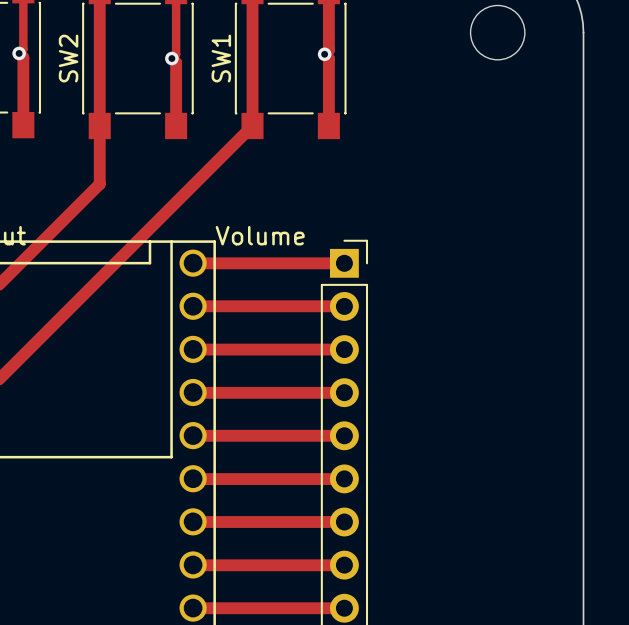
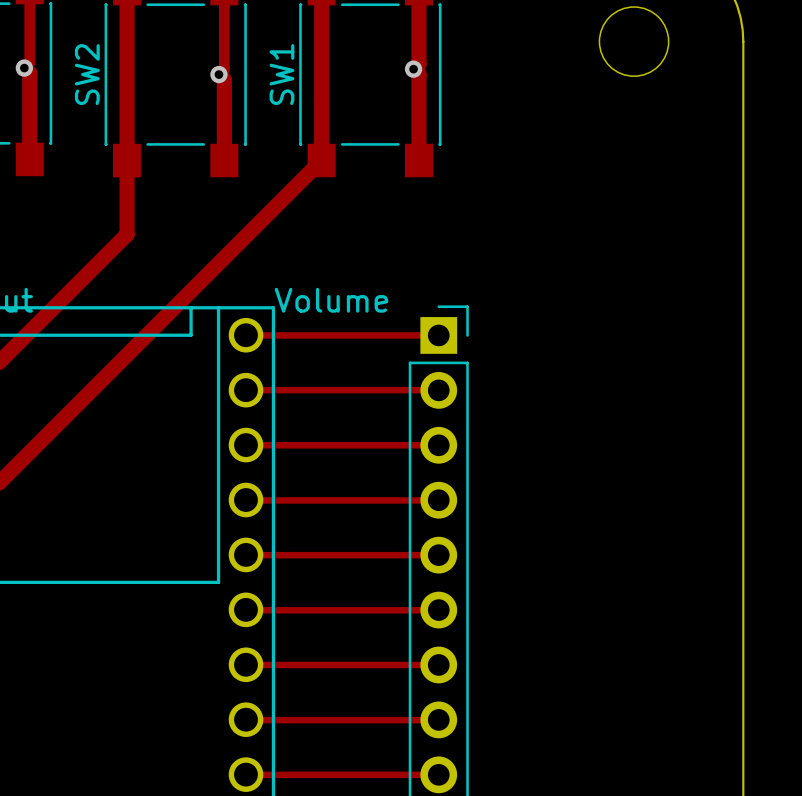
track width: thick (193, 263) (344, 263) -> thin (245, 335) (438, 335)
track width: thick (193, 306) (344, 306) -> thin (246, 390) (438, 390)
track width: thick (193, 349) (344, 349) -> thin (246, 445) (438, 445)
track width: thick (193, 392) (344, 392) -> thin (245, 500) (438, 500)
track width: thick (193, 435) (344, 435) -> thin (246, 555) (438, 555)
track width: thick (193, 479) (344, 479) -> thin (245, 610) (438, 610)
track width: thick (193, 522) (344, 522) -> thin (246, 664) (438, 664)
track width: thick (193, 565) (344, 565) -> thin (245, 720) (438, 720)
track width: thick (193, 608) (344, 608) -> thin (246, 774) (438, 774)

